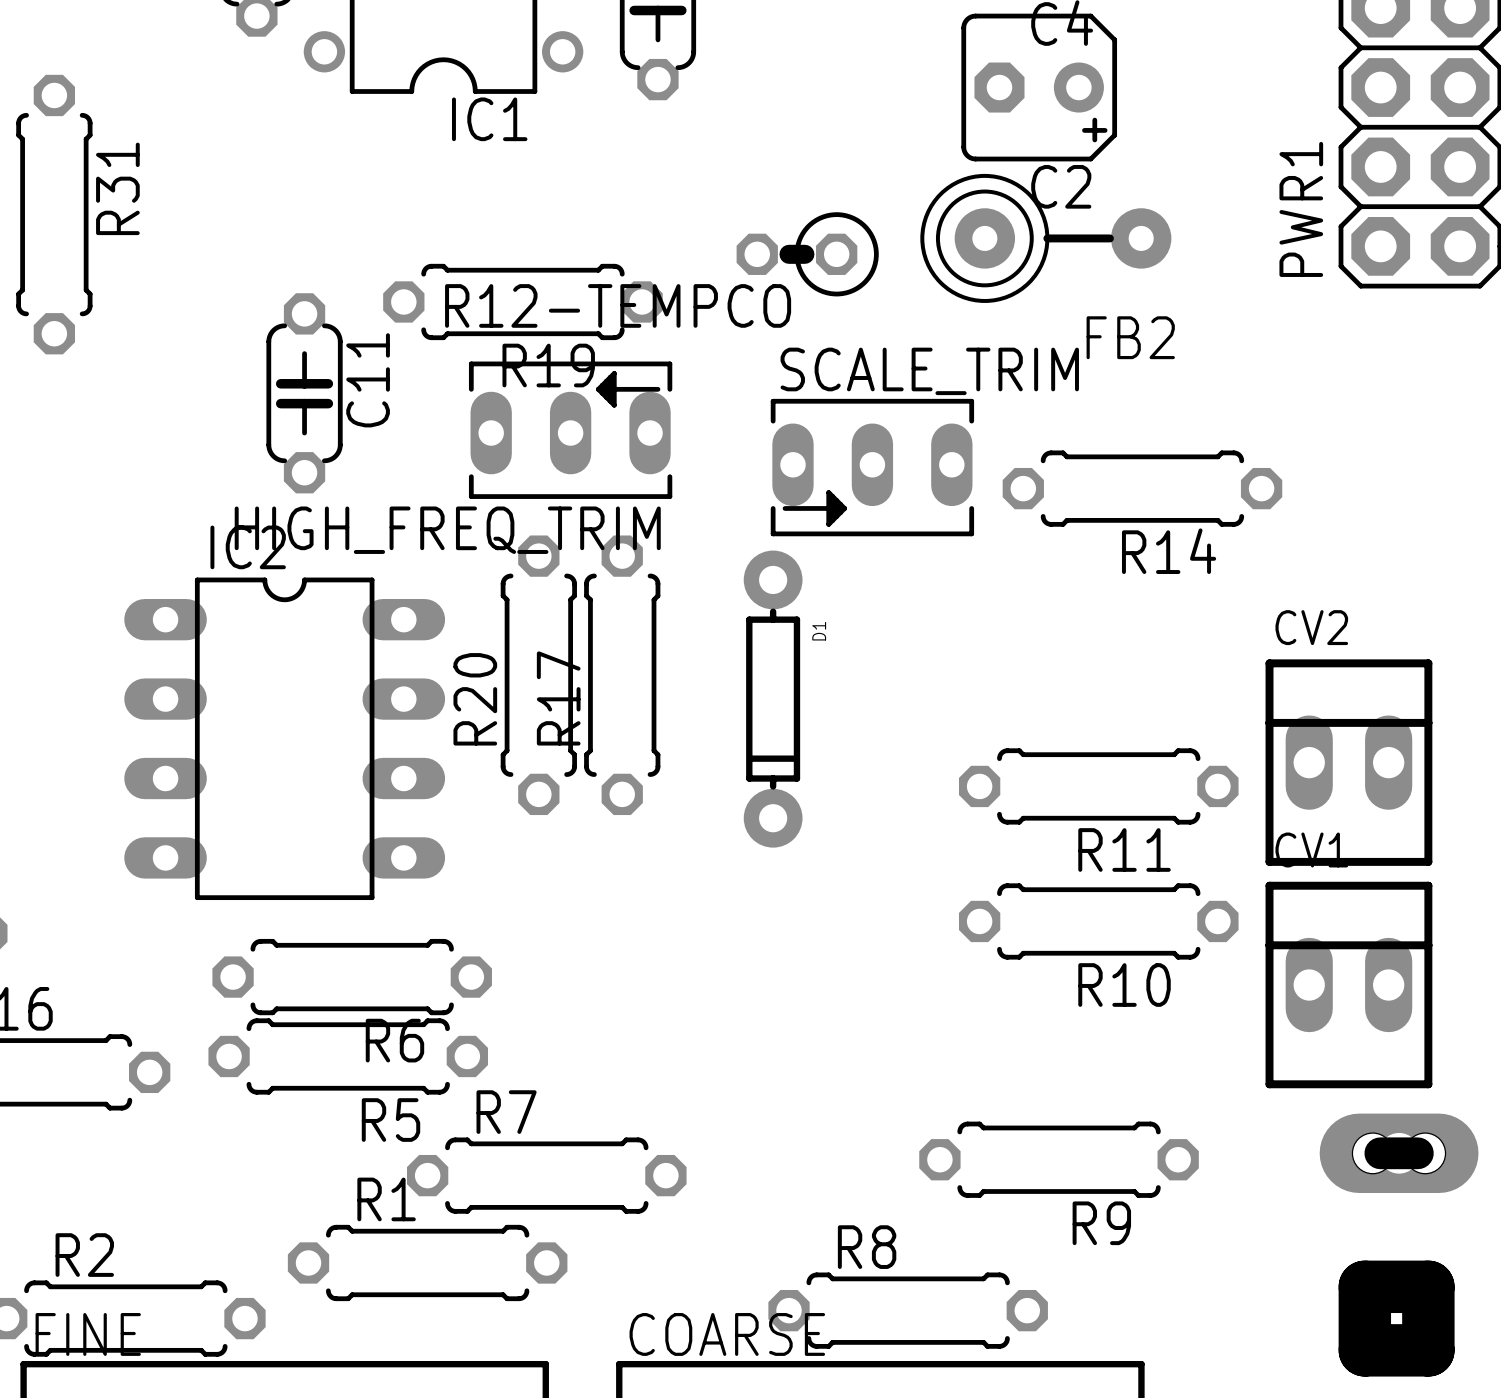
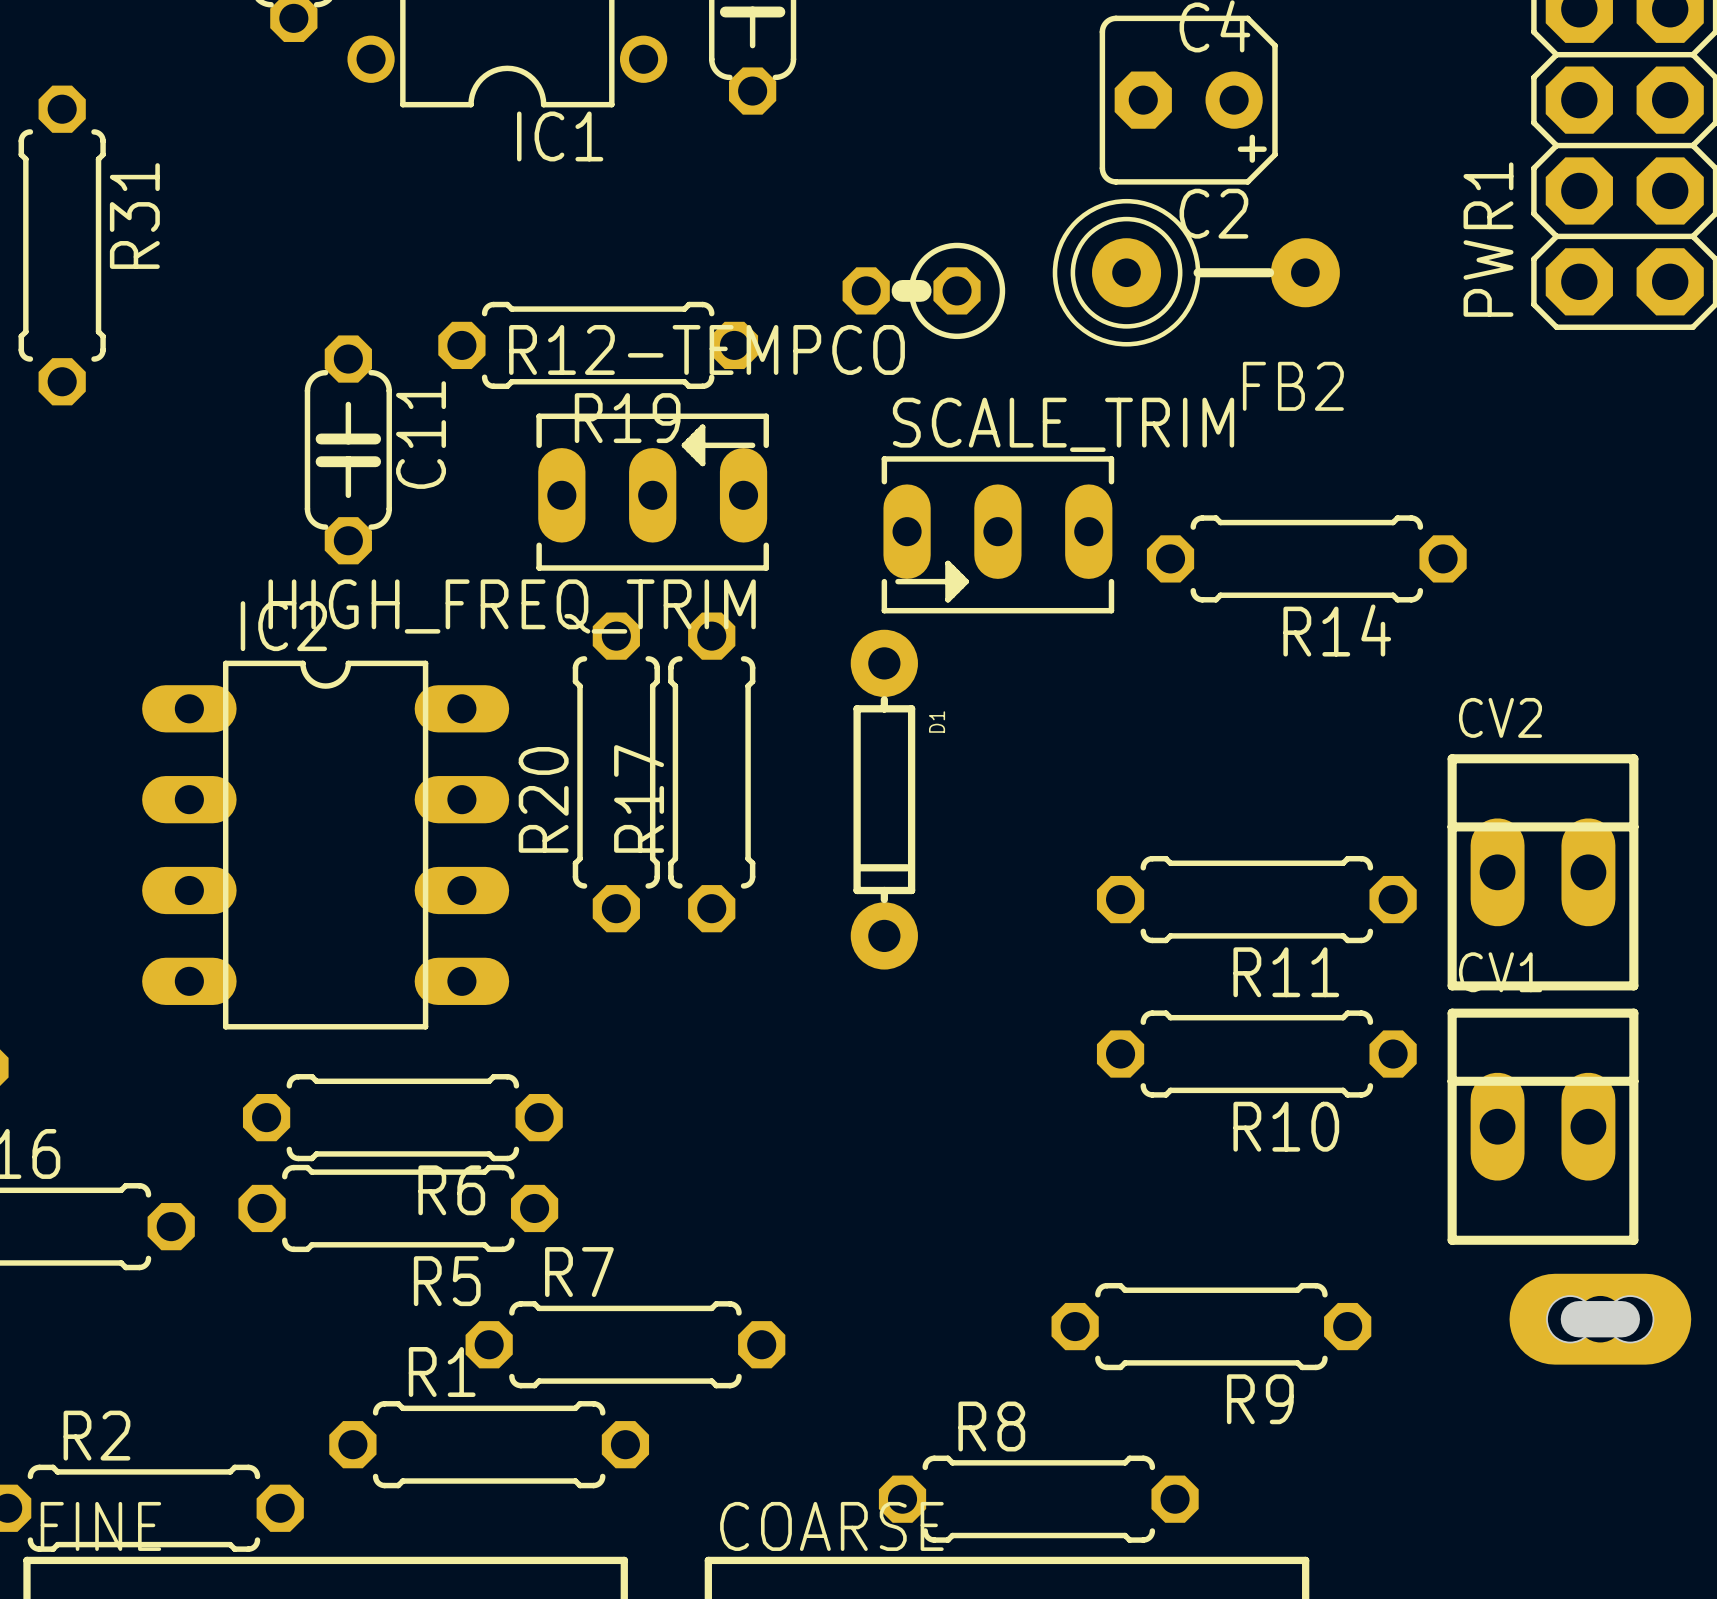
board edge: (1364, 1286) (1428, 1286) (1428, 1350) (1364, 1350) (1364, 1286) -> none

